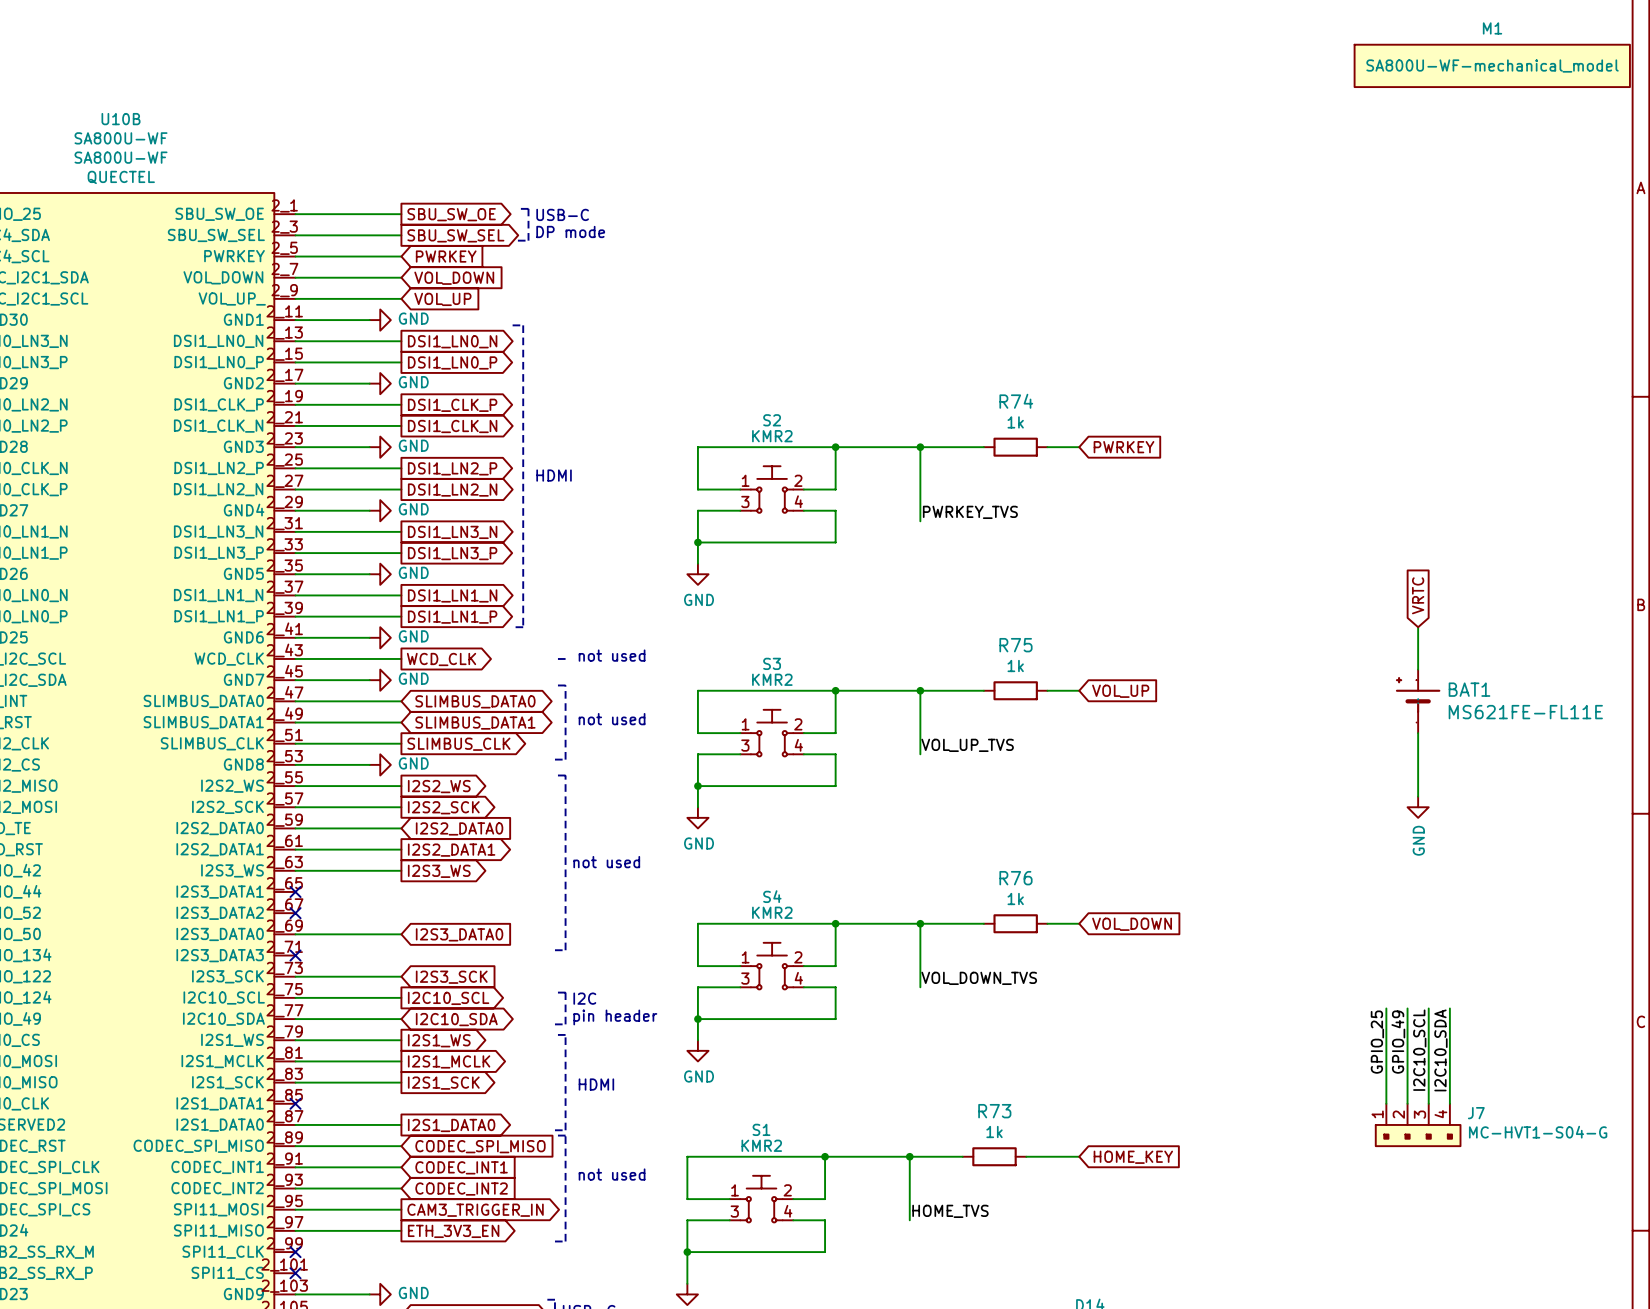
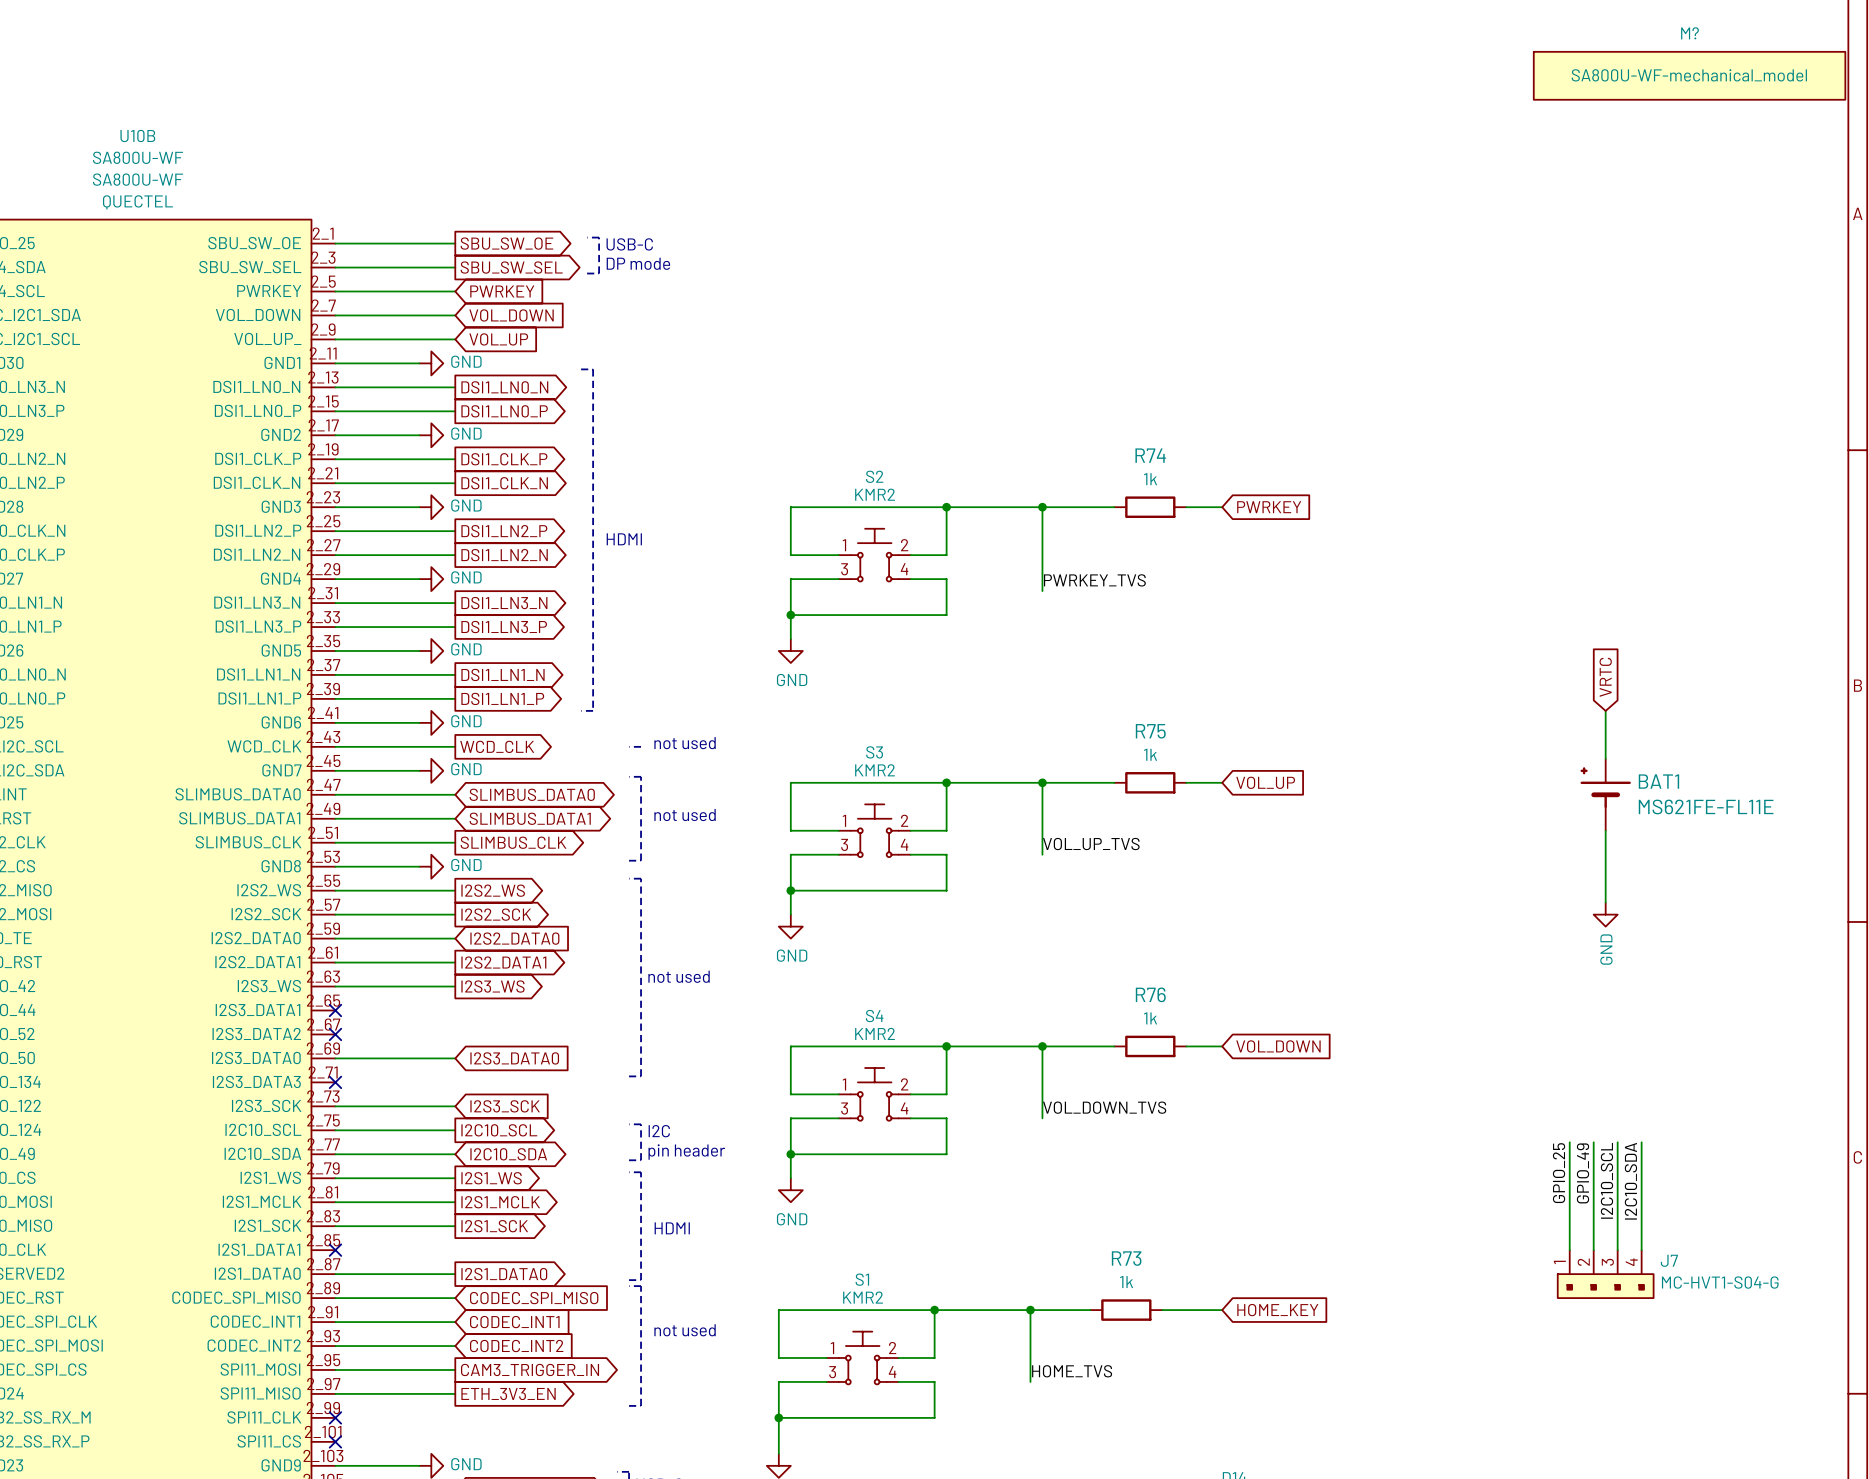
M1 name: M1 (1492, 28) -> M? (1689, 33)

